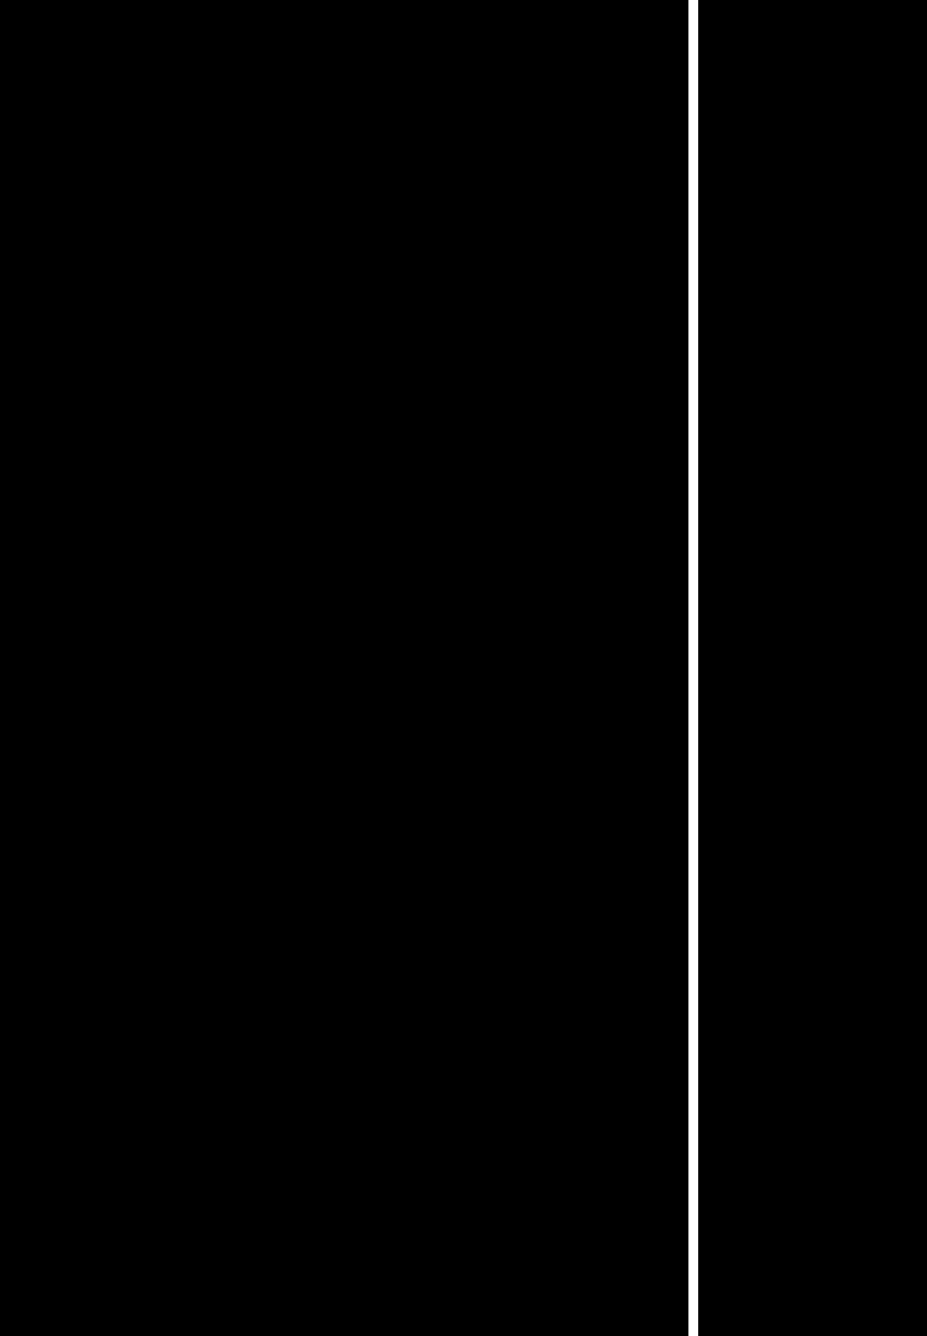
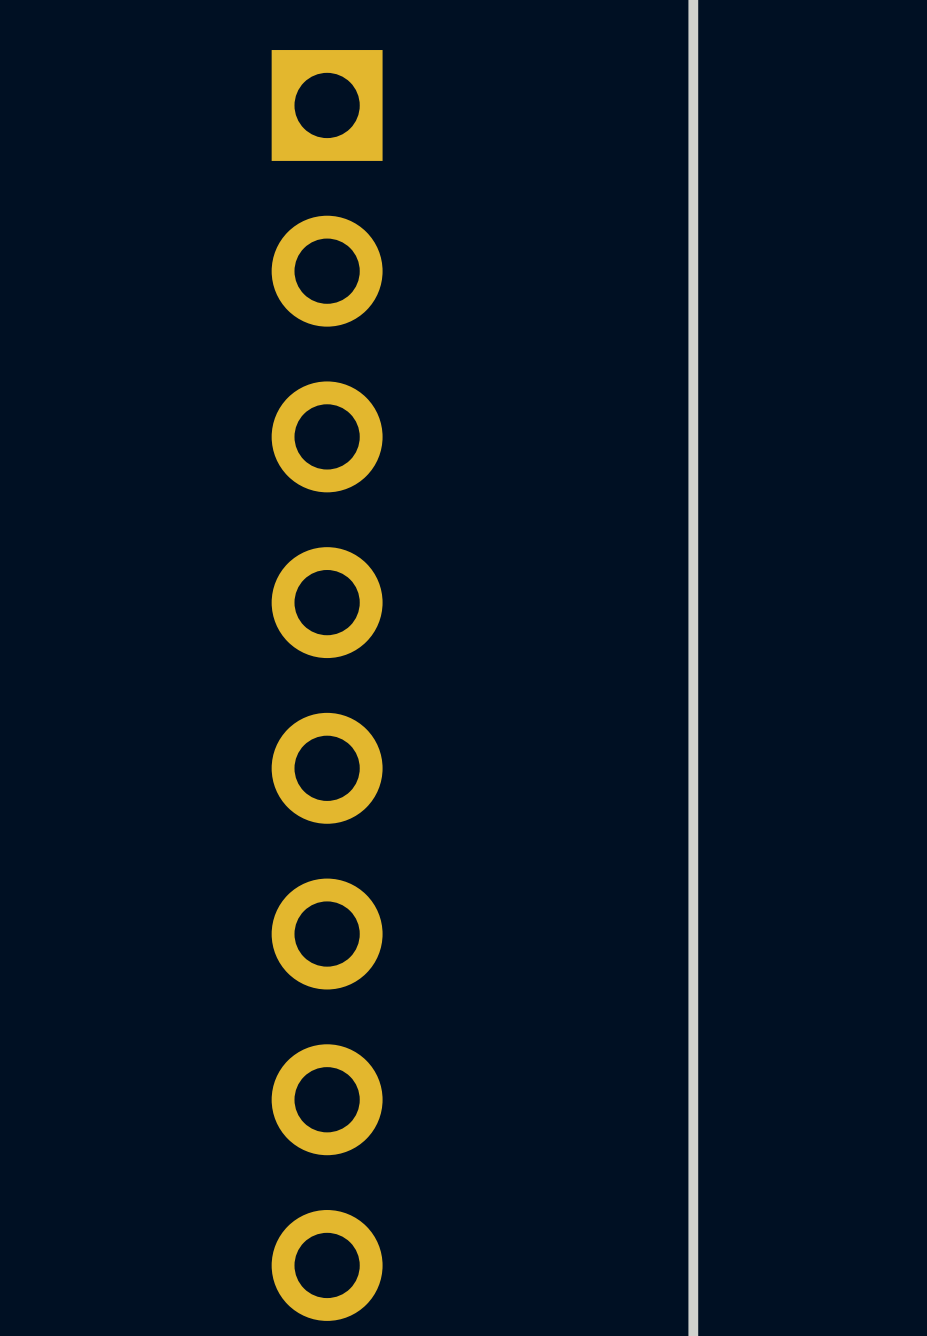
part: none -> (327, 685)

